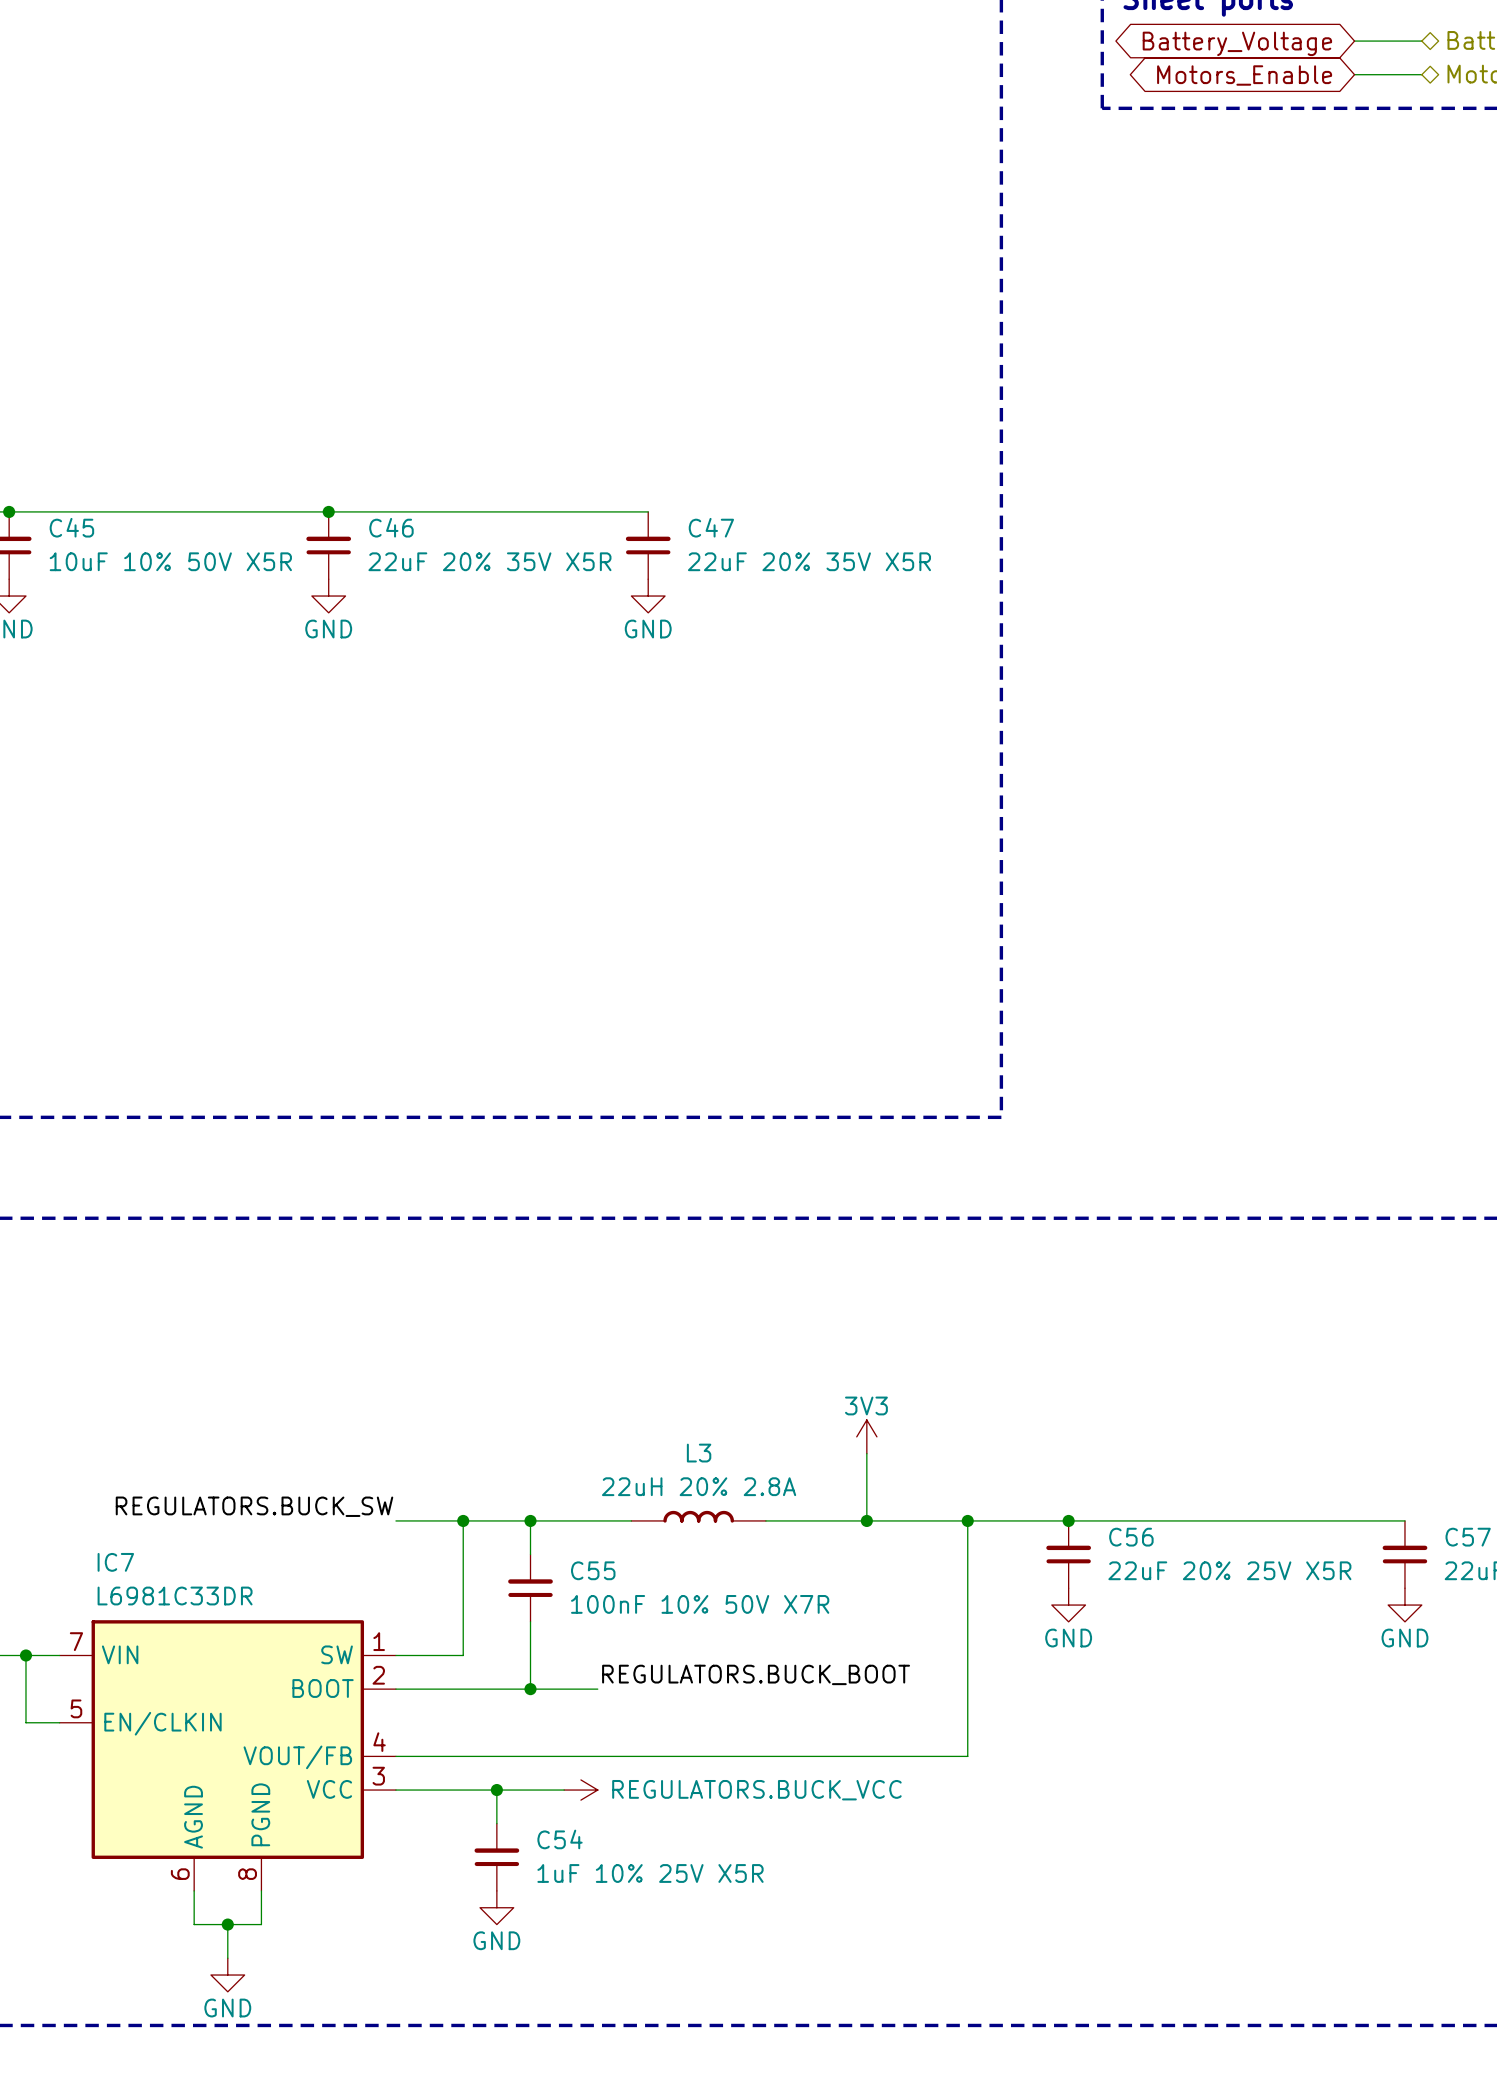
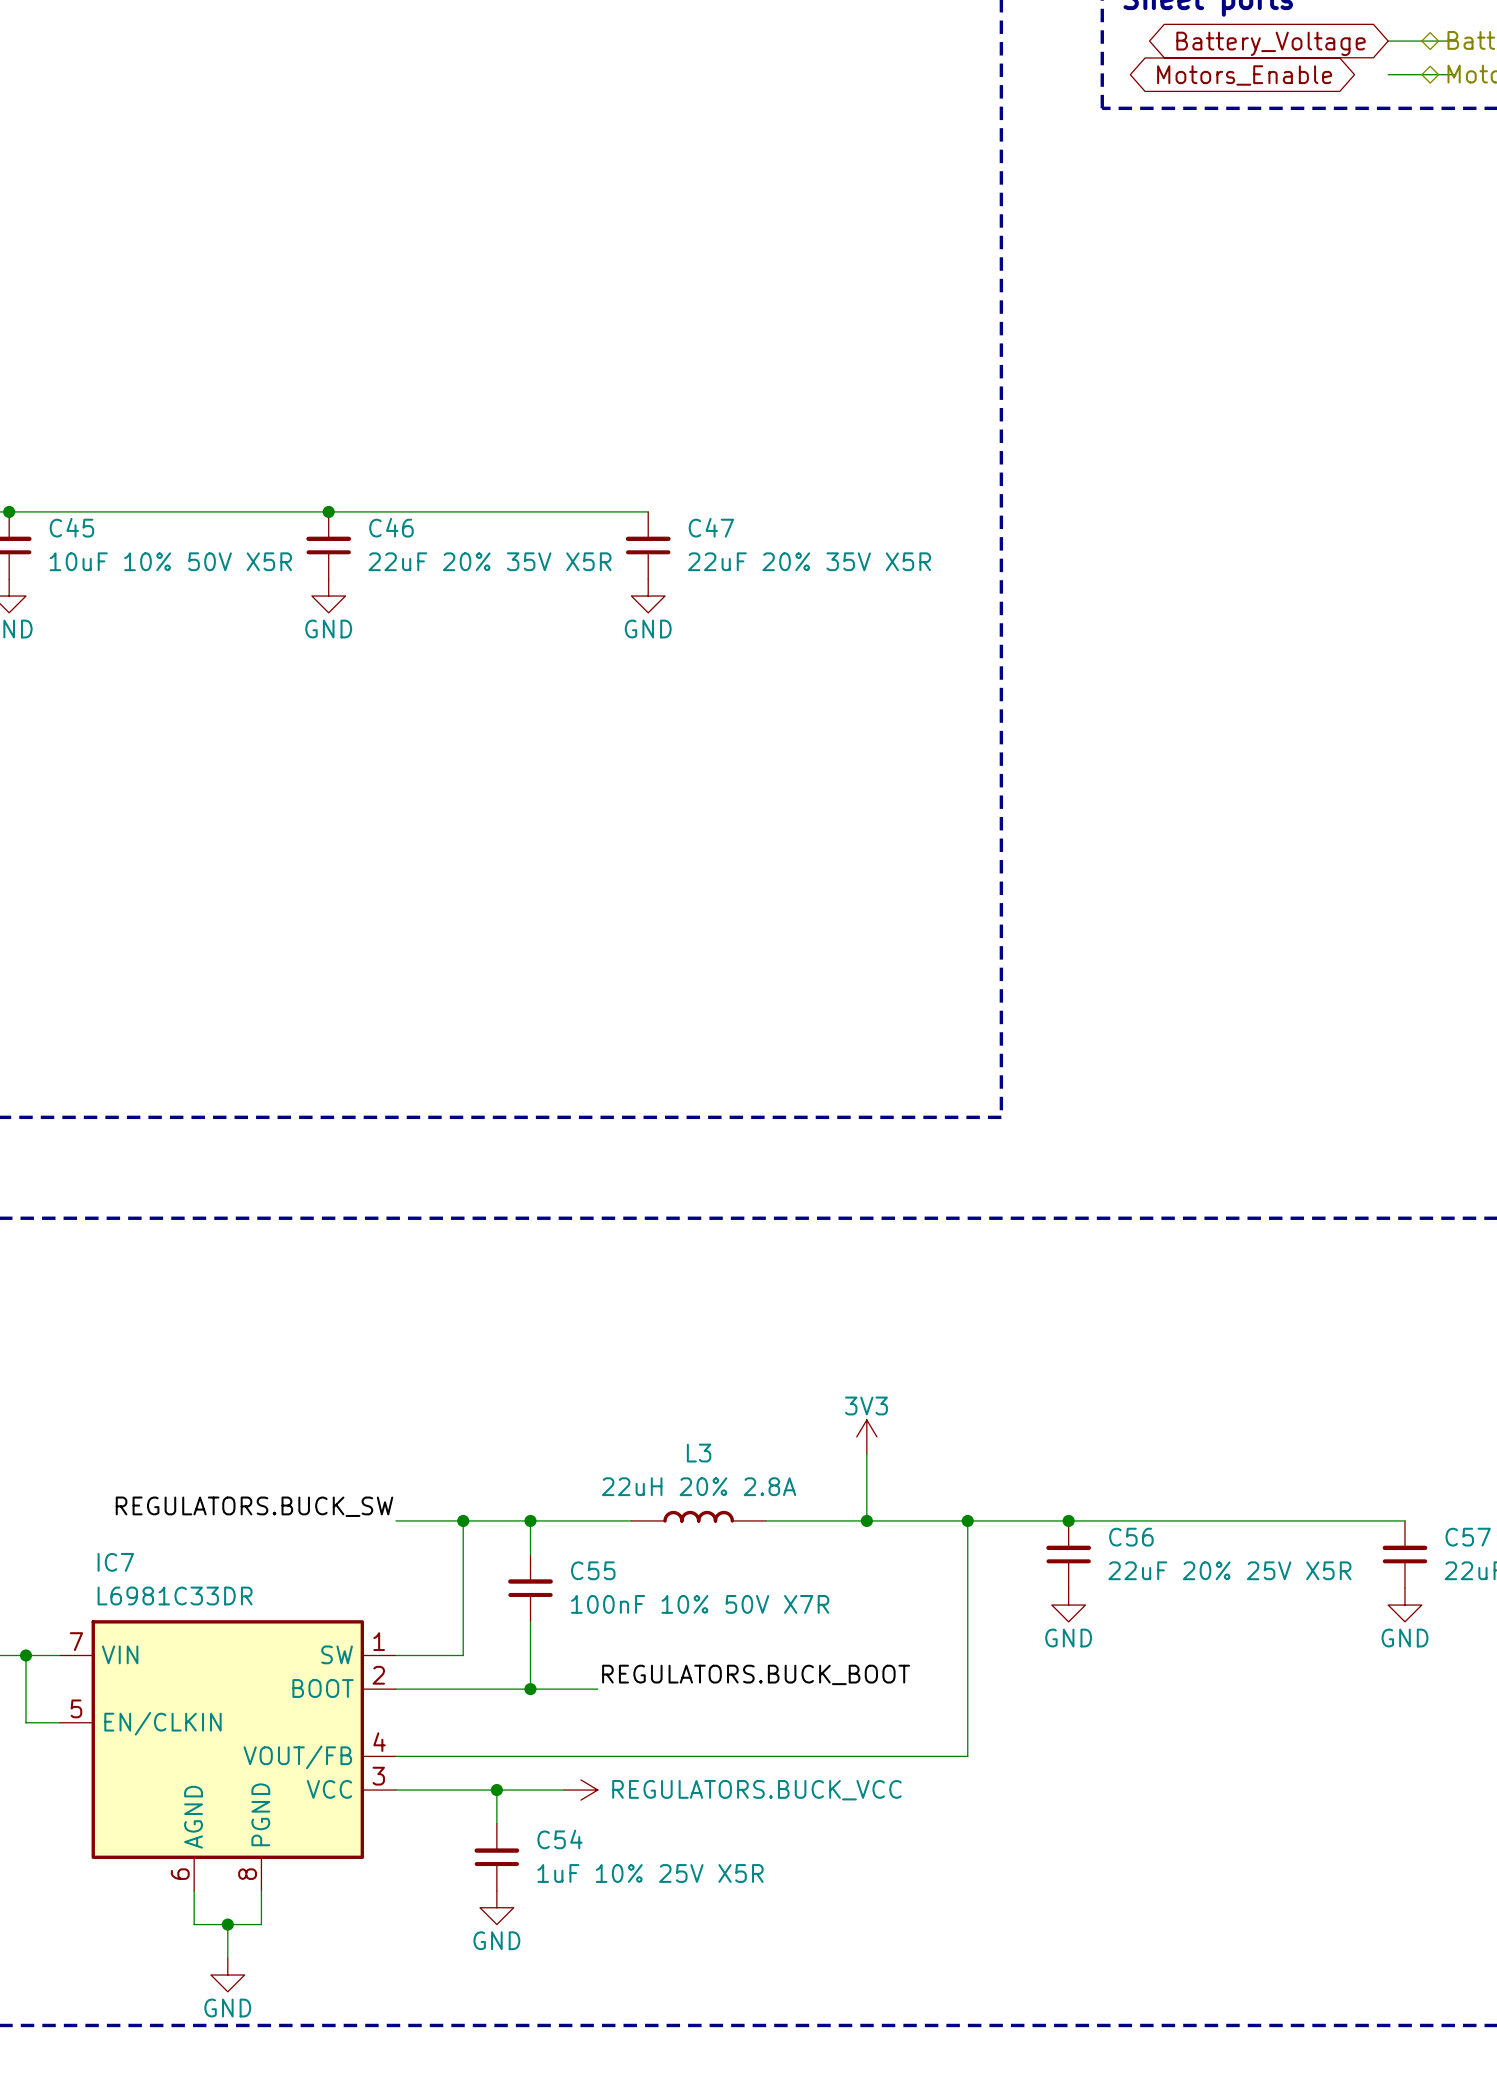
wire: (1354, 41) (1388, 41) -> (1421, 41) (1455, 41)
global label position: Battery_Voltage (1237, 43) -> Battery_Voltage (1271, 43)
wire: (1354, 74) (1388, 74) -> (1421, 74) (1455, 74)

